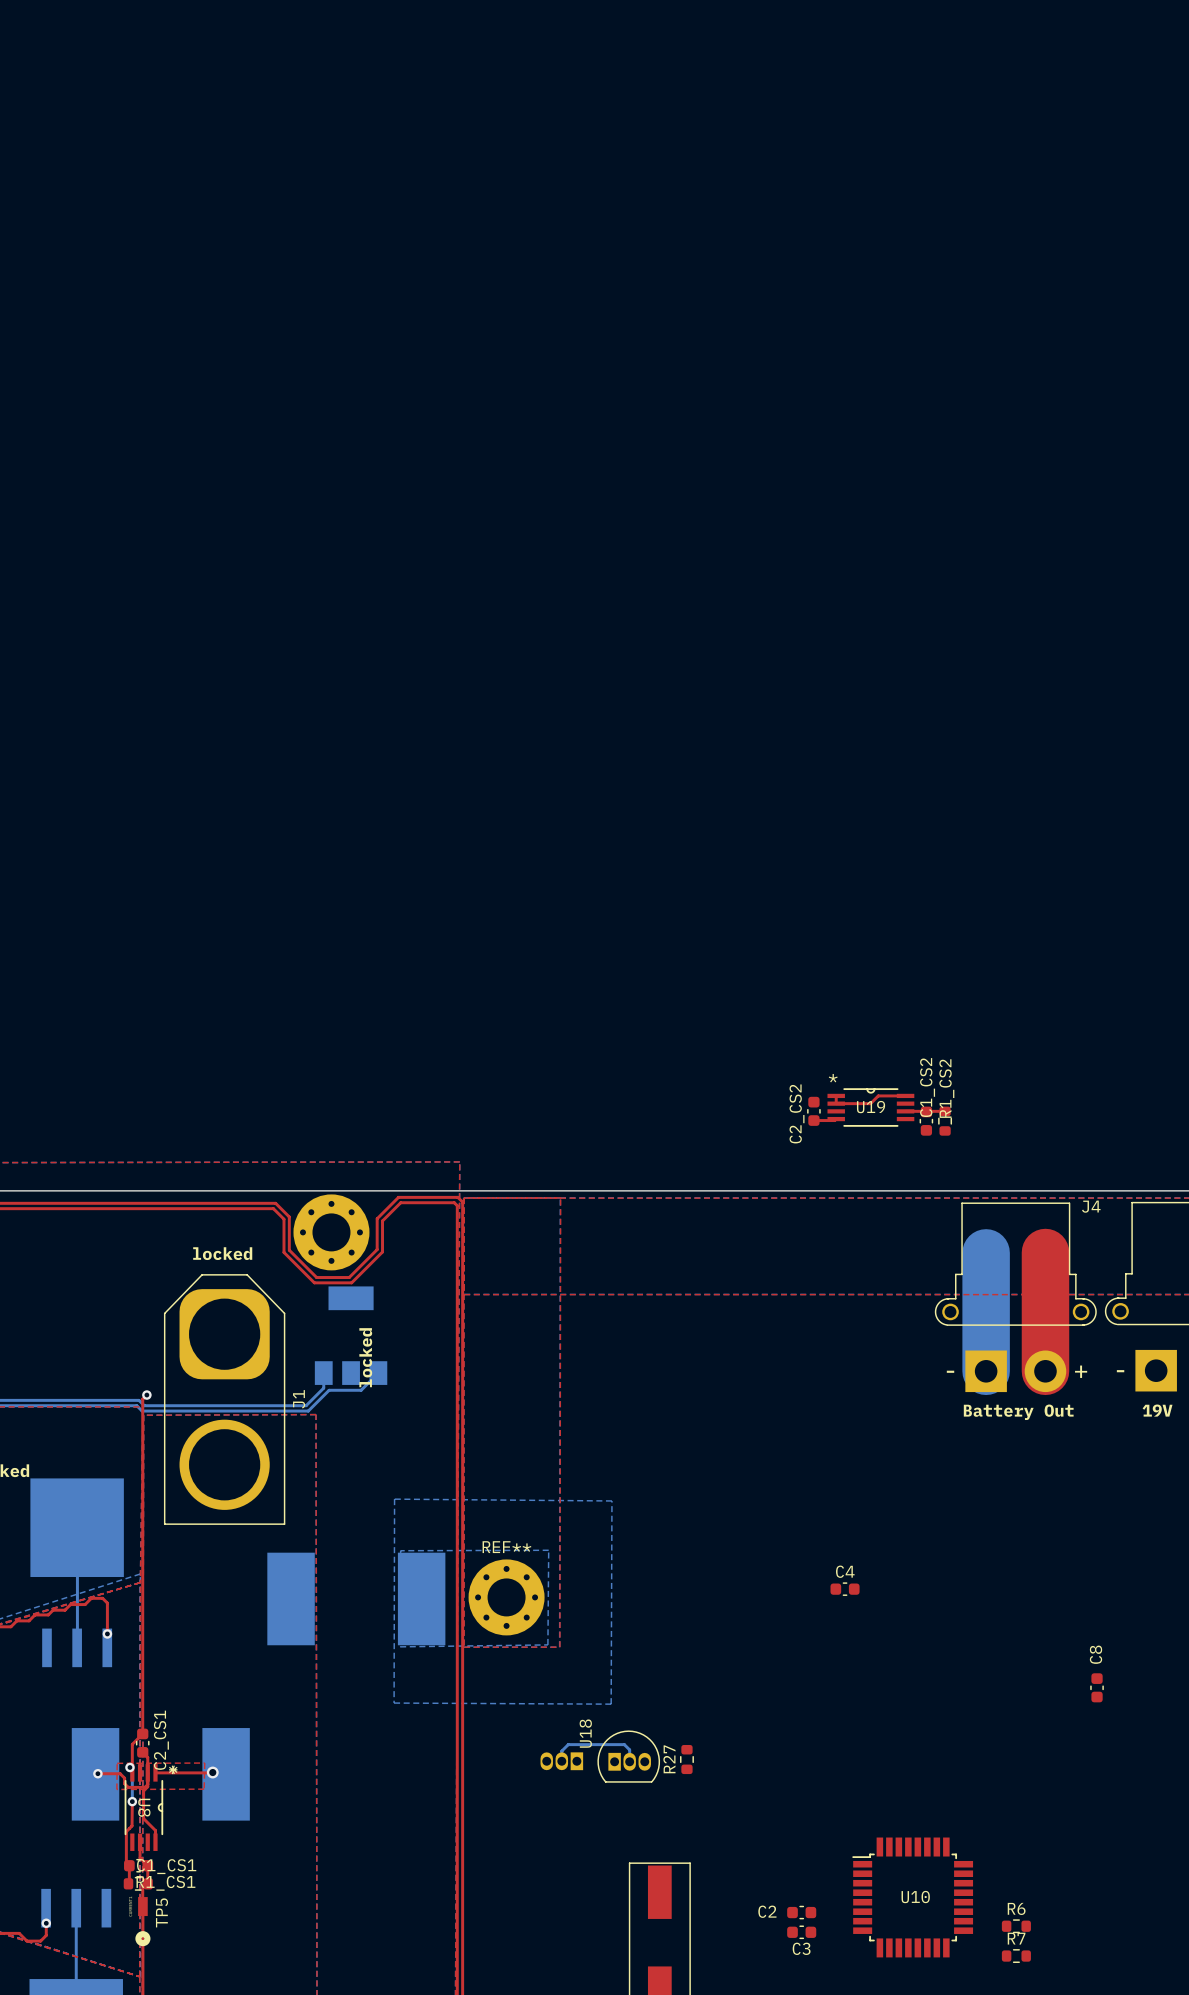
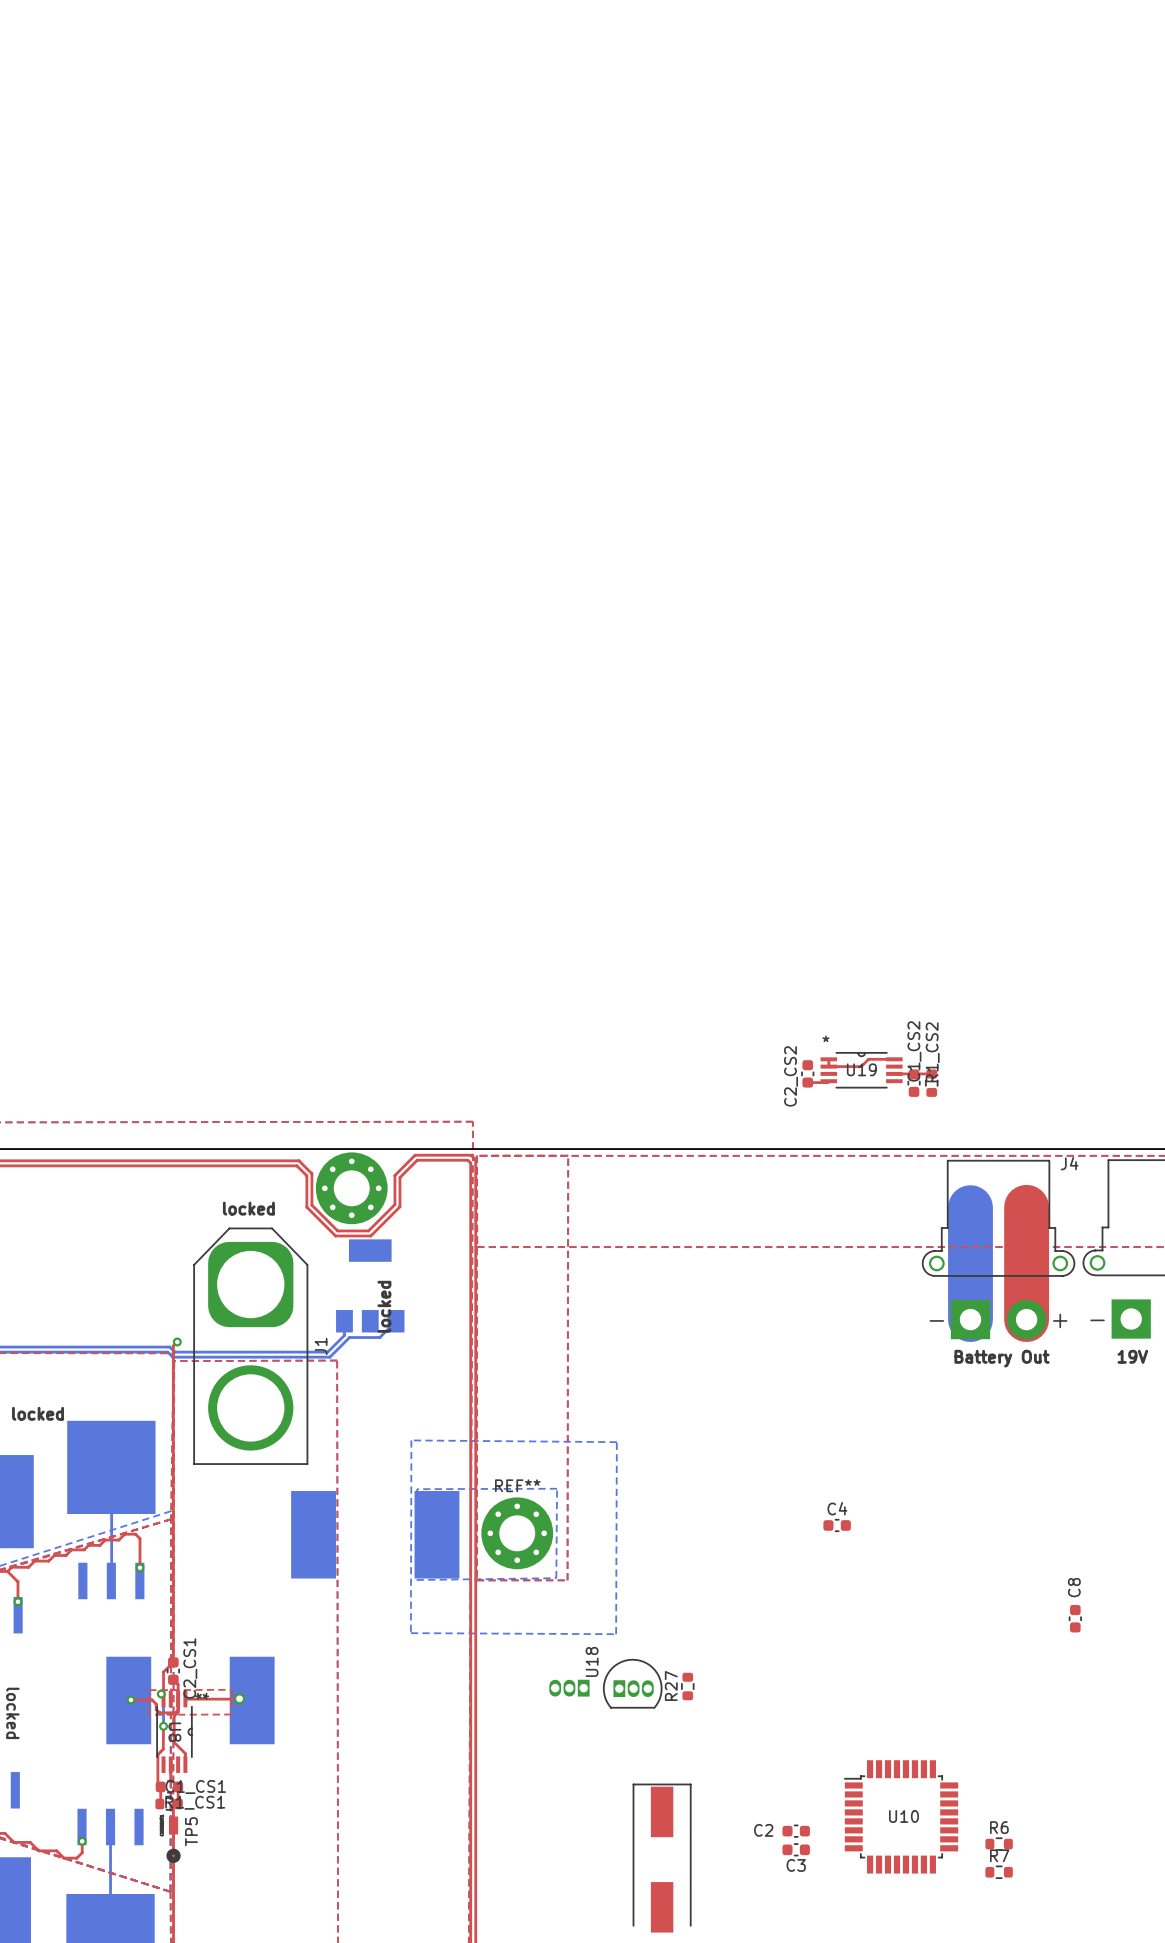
bottom track: (561, 1761) (561, 1751) (568, 1744) (624, 1744) (629, 1749) (629, 1761) -> none

